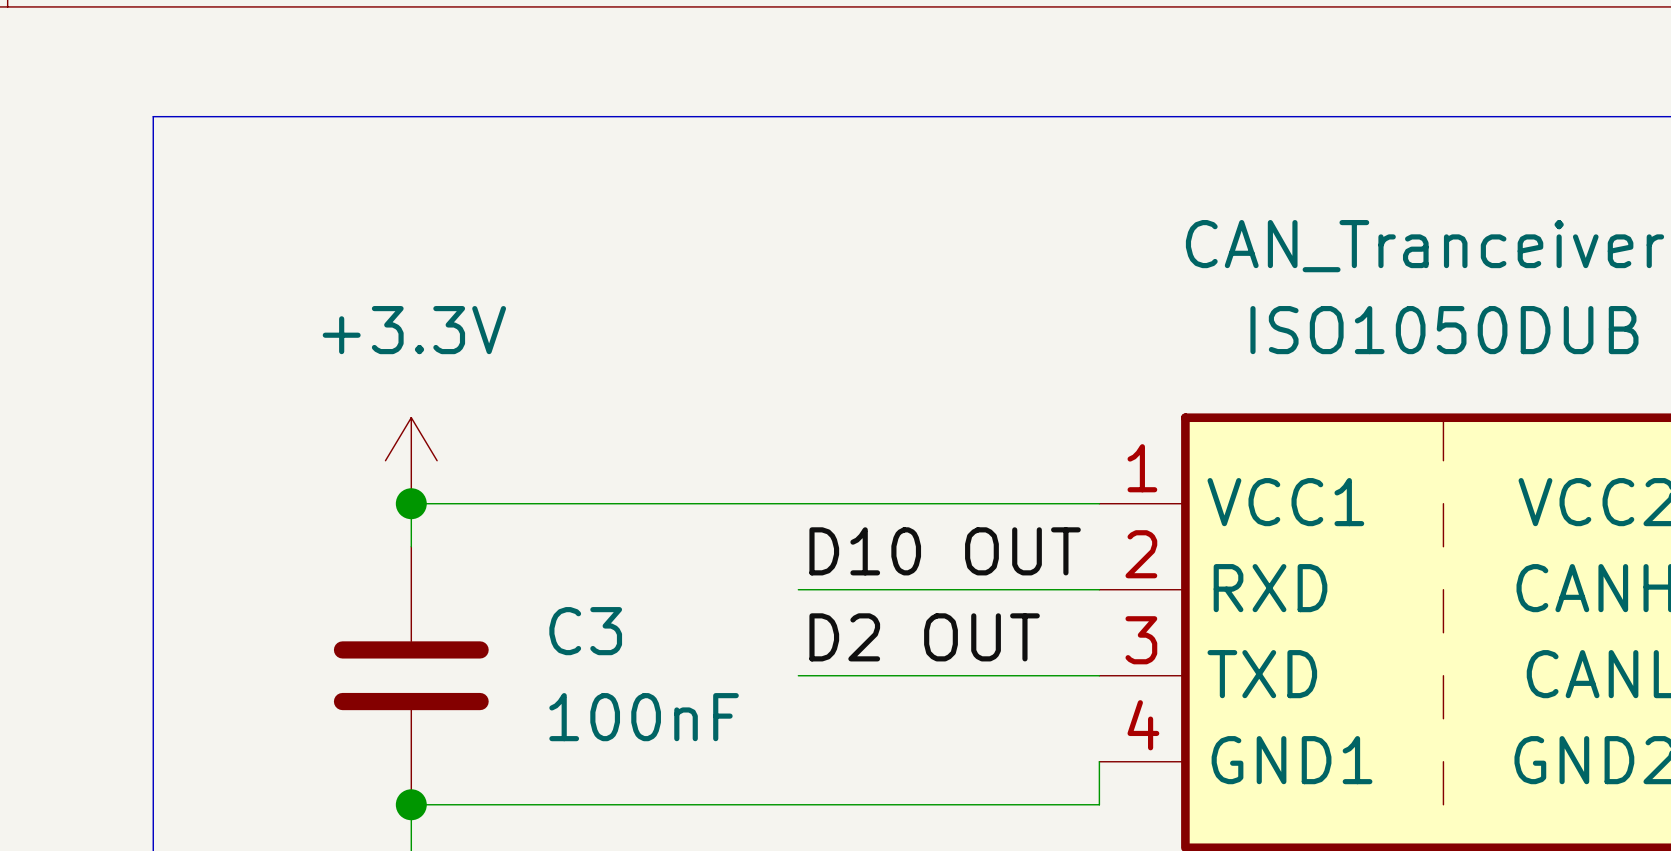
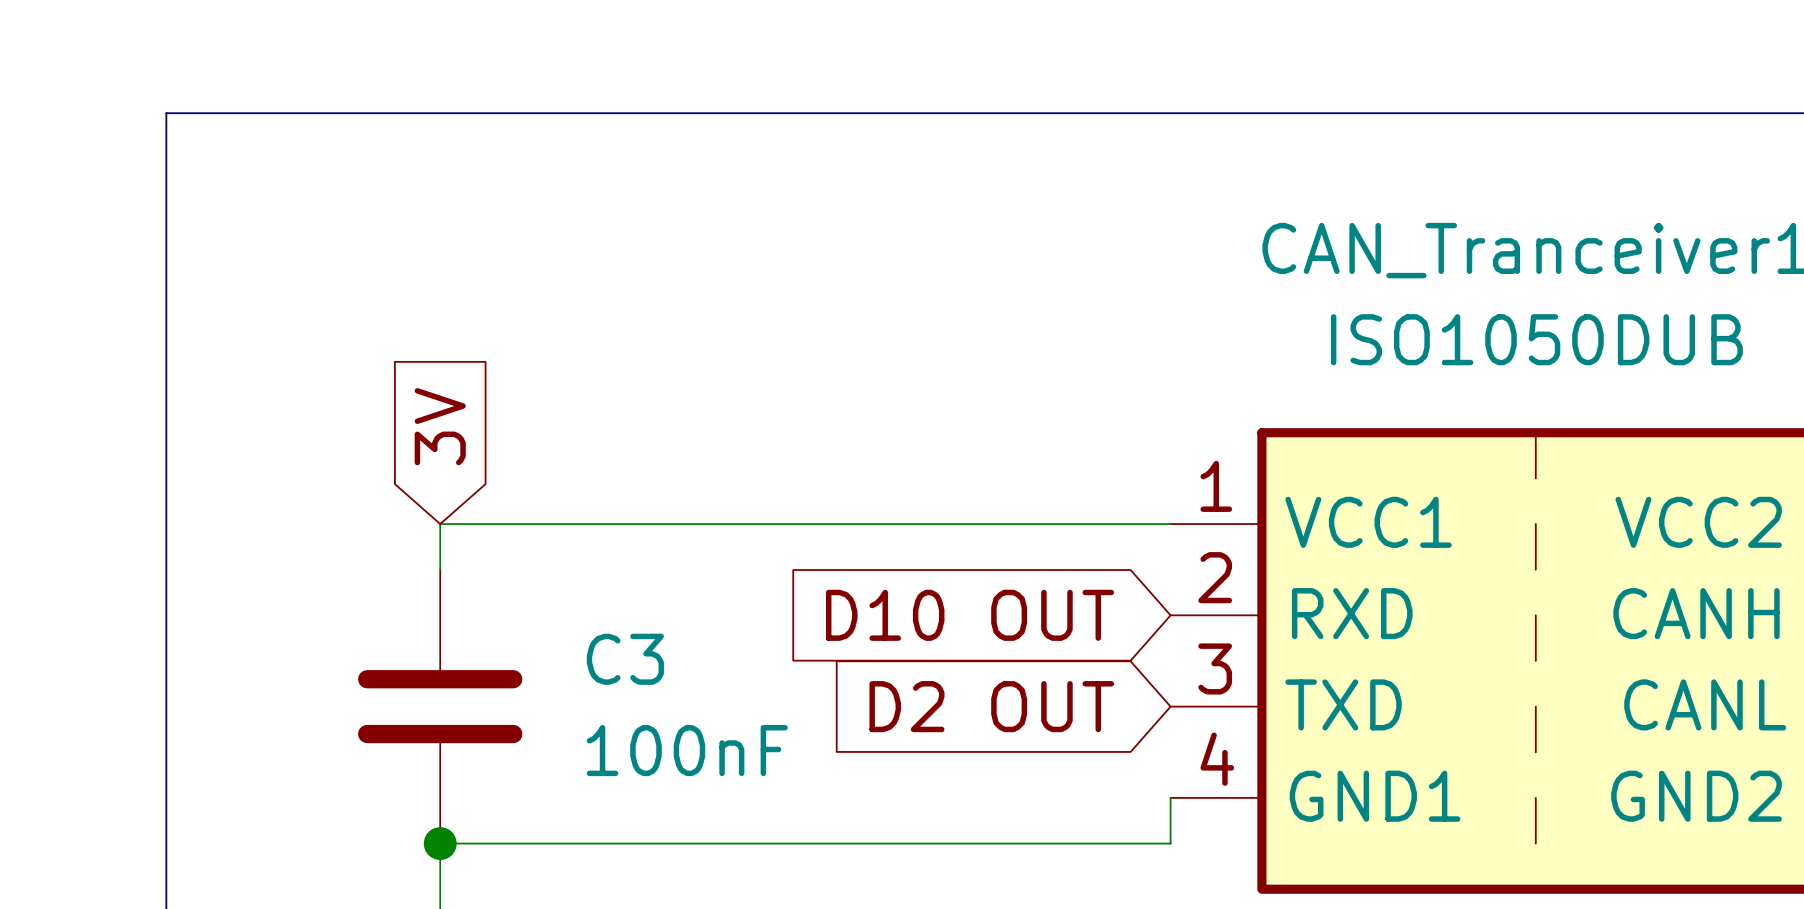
global label: none -> 3V (440, 426)
power symbol: +3.3V (411, 460) -> none
junction: (411, 503) -> none
label: D10 OUT (945, 551) -> none
wire: (798, 589) (1099, 589) -> none
global label: none -> D10 OUT (970, 615)
label: D2 OUT (924, 637) -> none
wire: (798, 675) (1099, 675) -> none
global label: none -> D2 OUT (991, 706)

